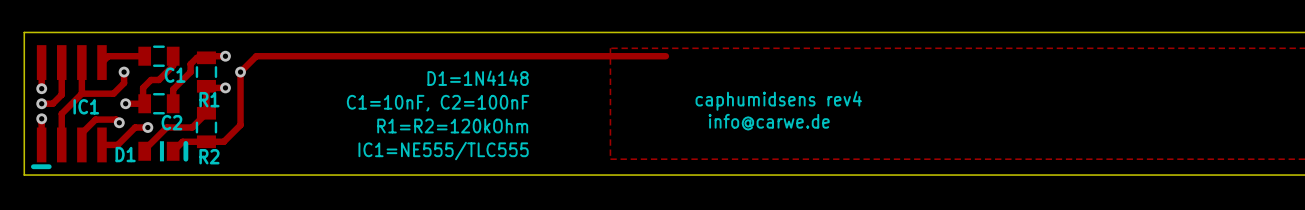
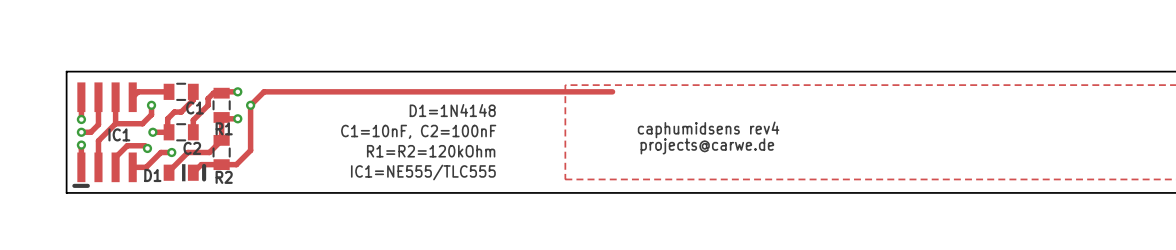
text: info@carwe.de (769, 122) -> projects@carwe.de (707, 146)

